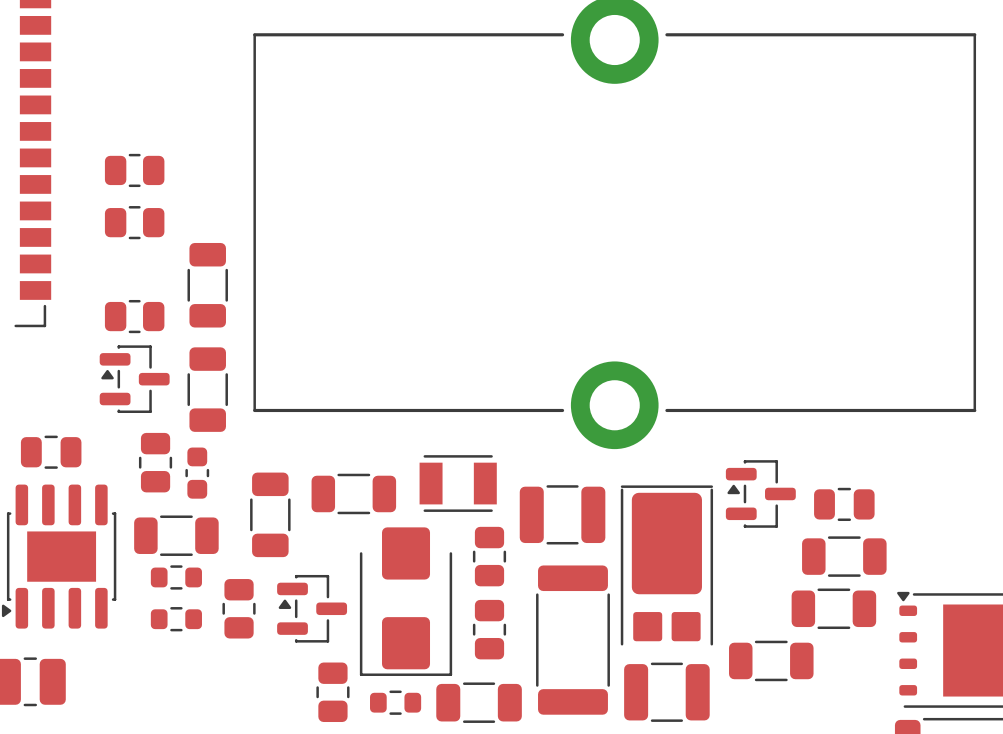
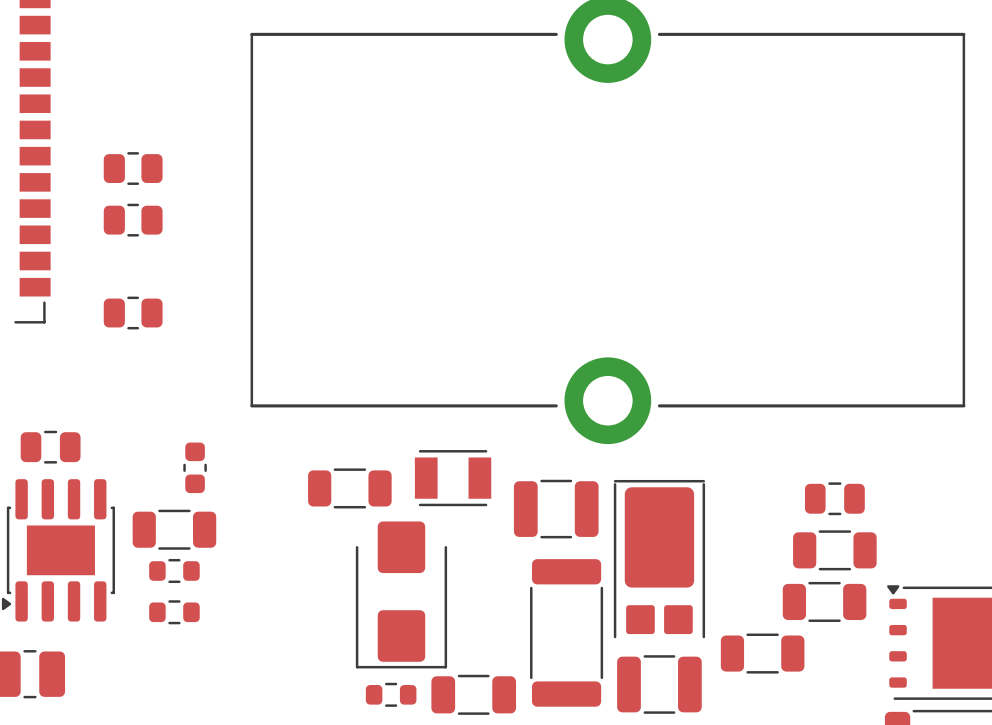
part: (207, 285) -> none
part: (134, 379) -> none
part: (207, 389) -> none
part: (155, 462) -> none
part: (760, 493) -> none
part: (270, 514) -> none
part: (489, 556) -> none
part: (239, 608) -> none
part: (312, 608) -> none
part: (489, 629) -> none
part: (332, 692) -> none

